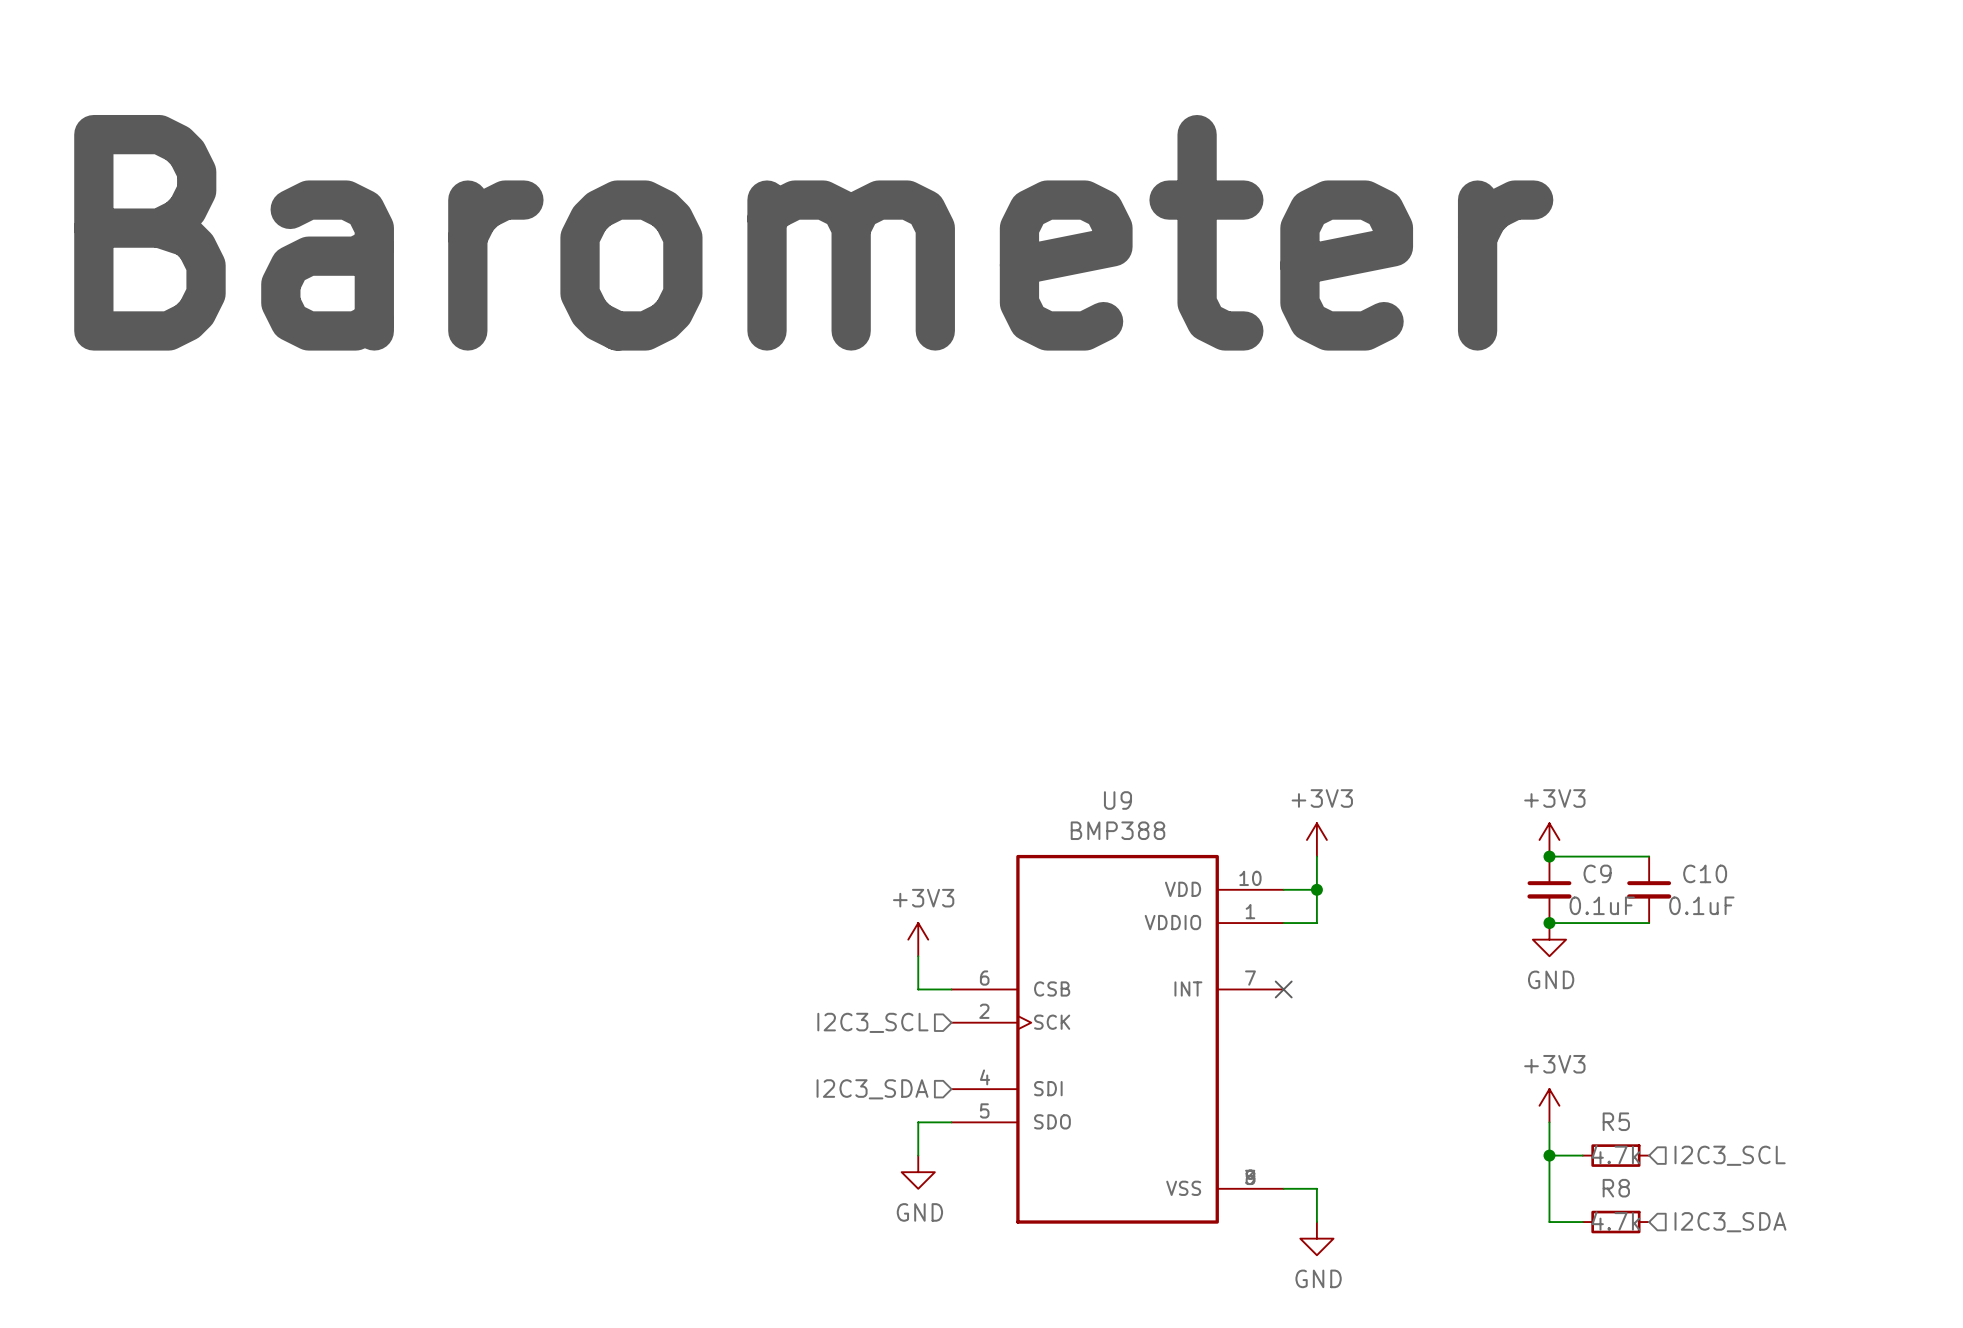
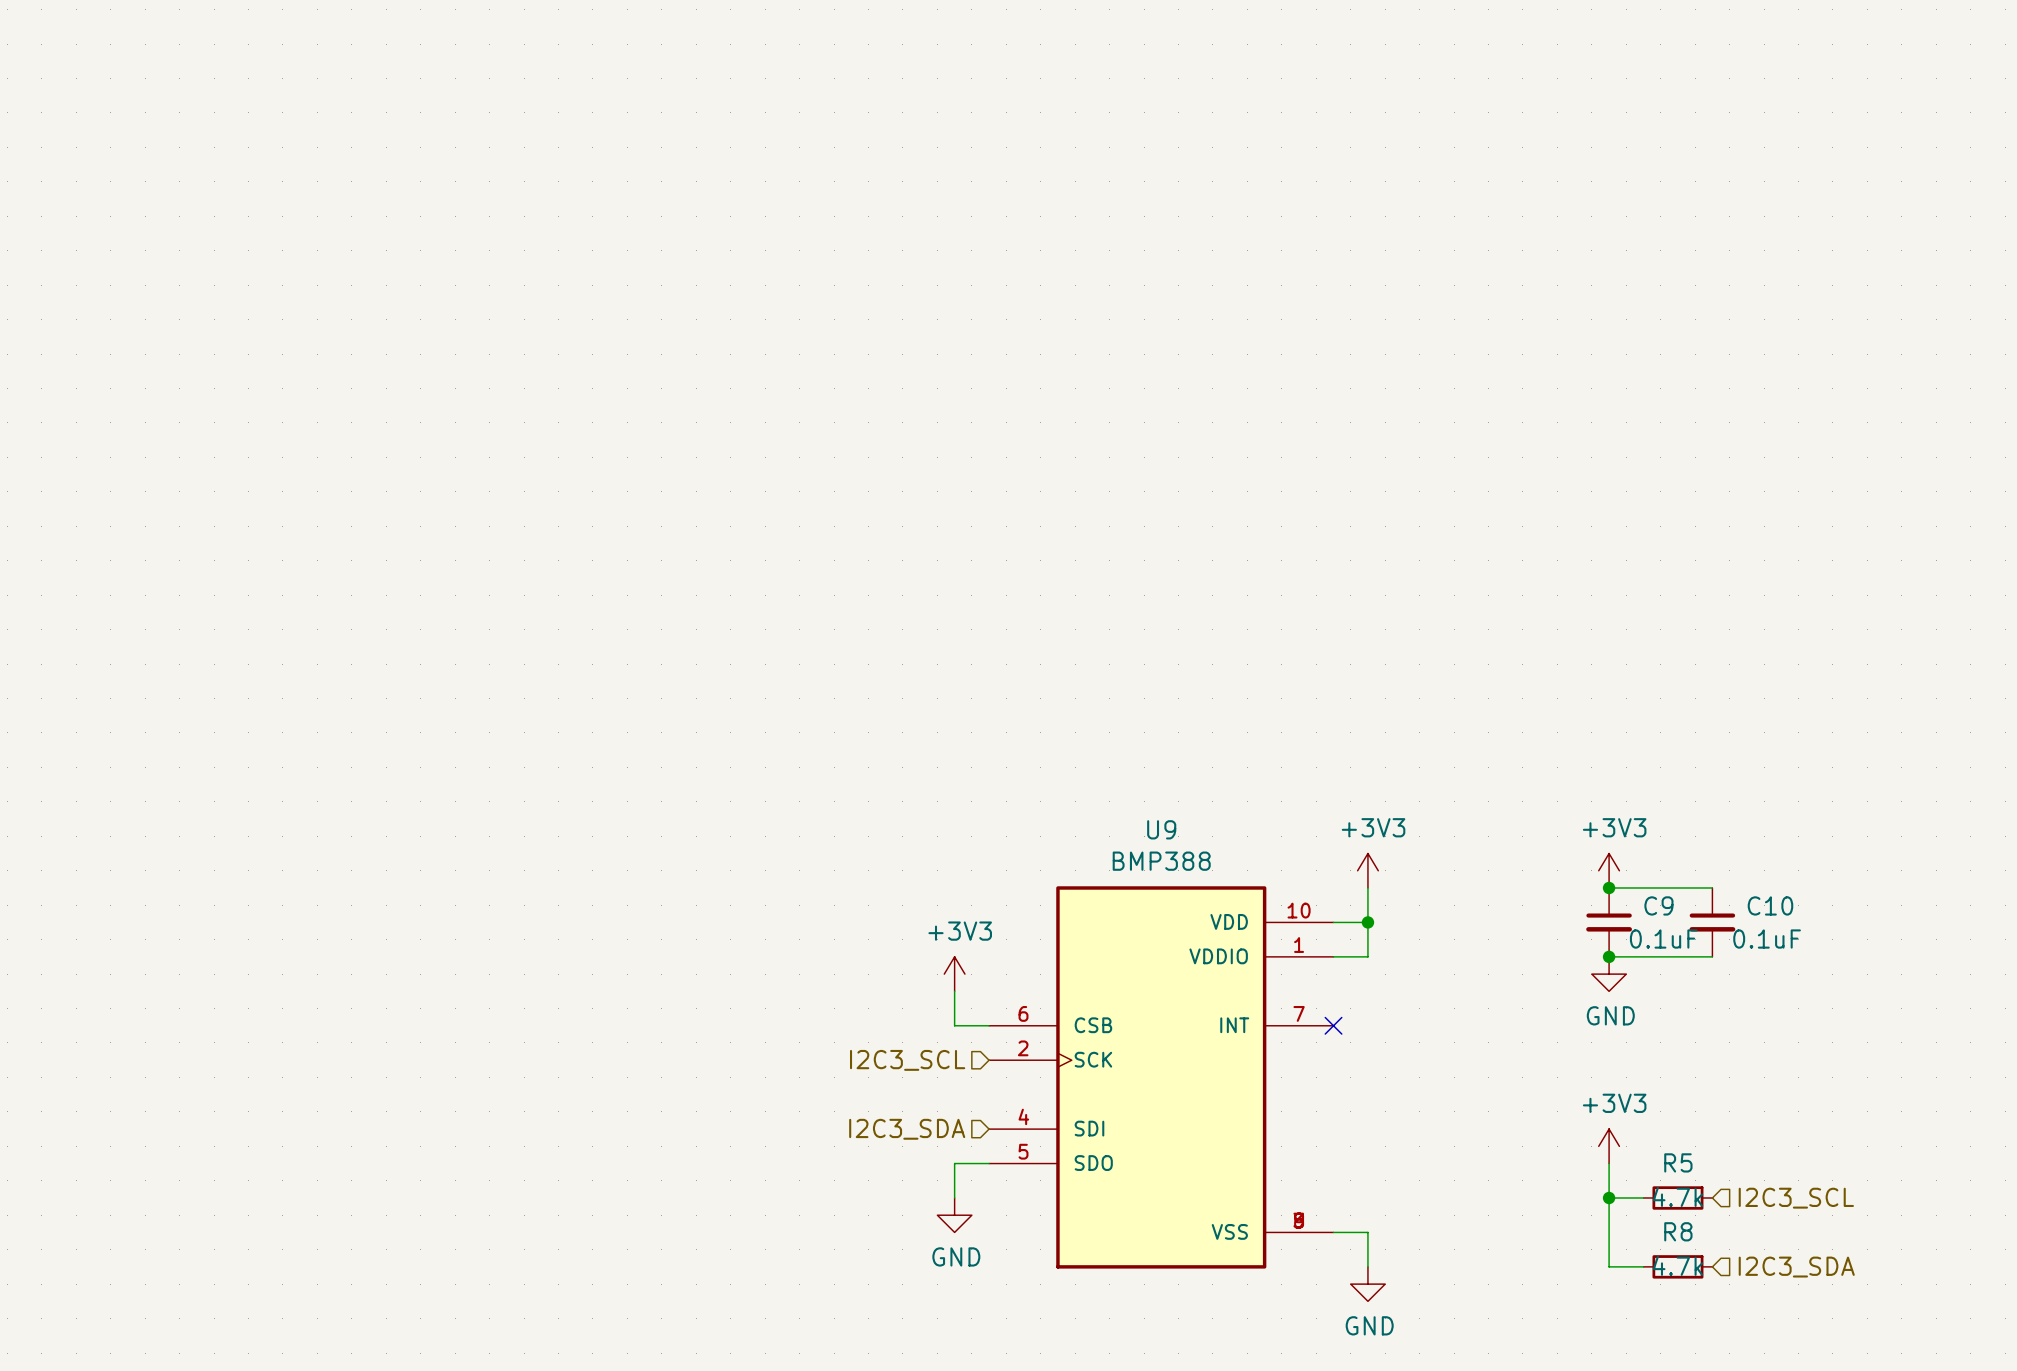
text: Barometer (813, 232) -> none

